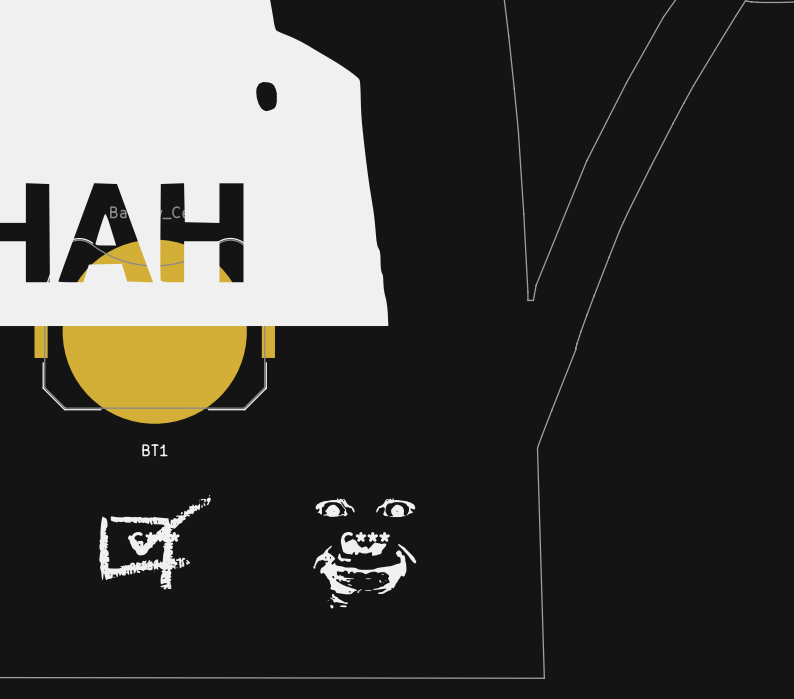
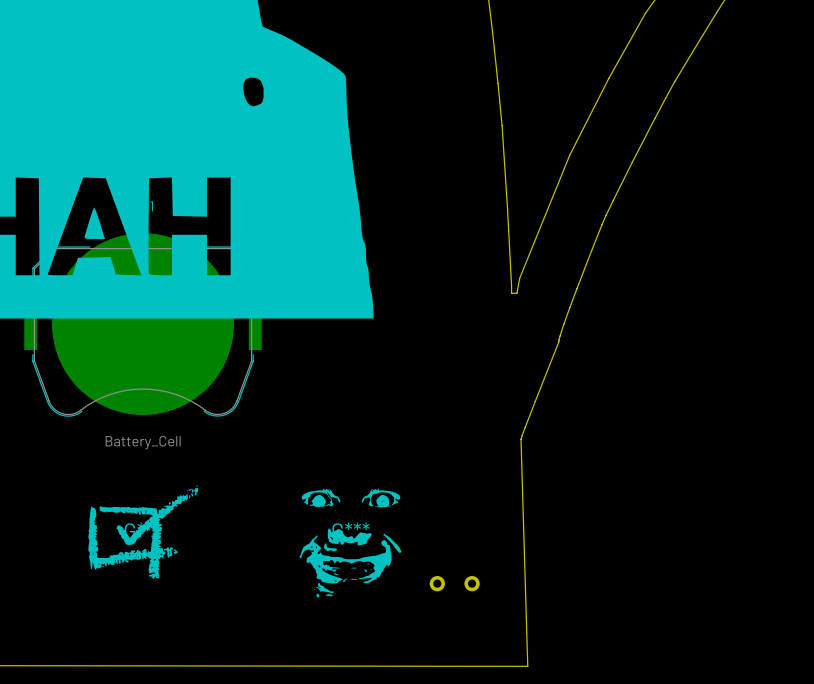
BT1 rotation: 0° (154, 330) -> 180° (143, 324)
part: none -> (454, 583)

